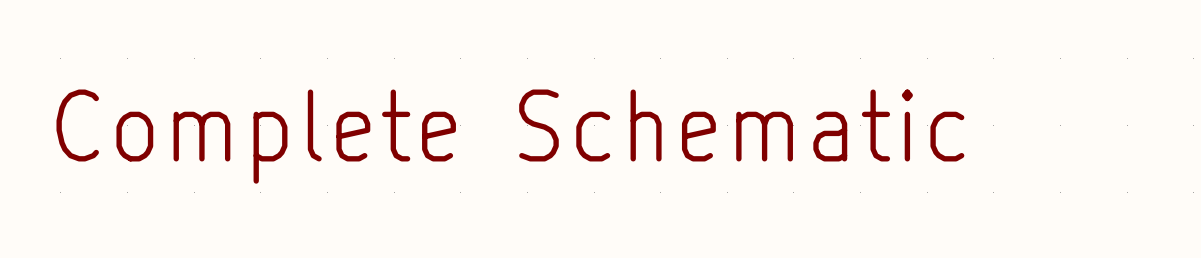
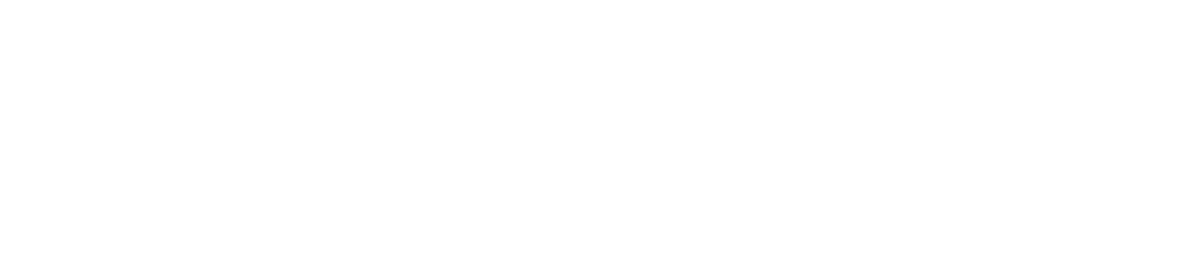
text: Complete Schematic (510, 136) -> none

